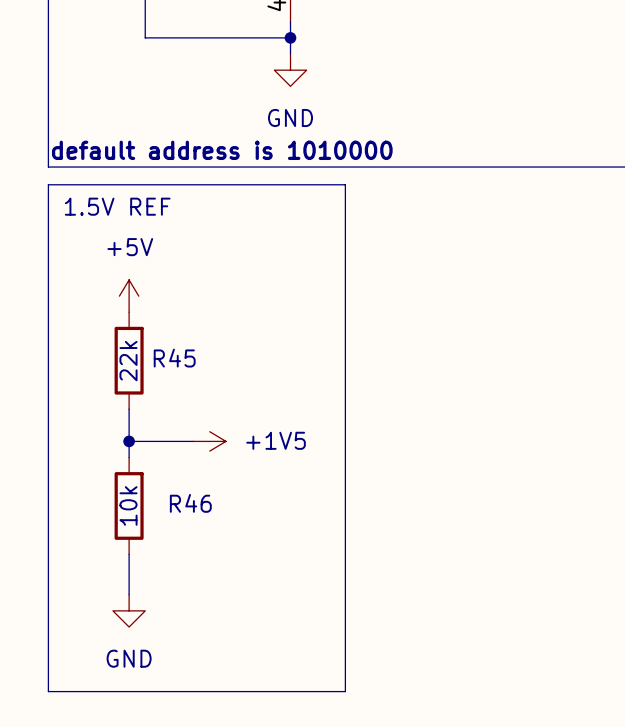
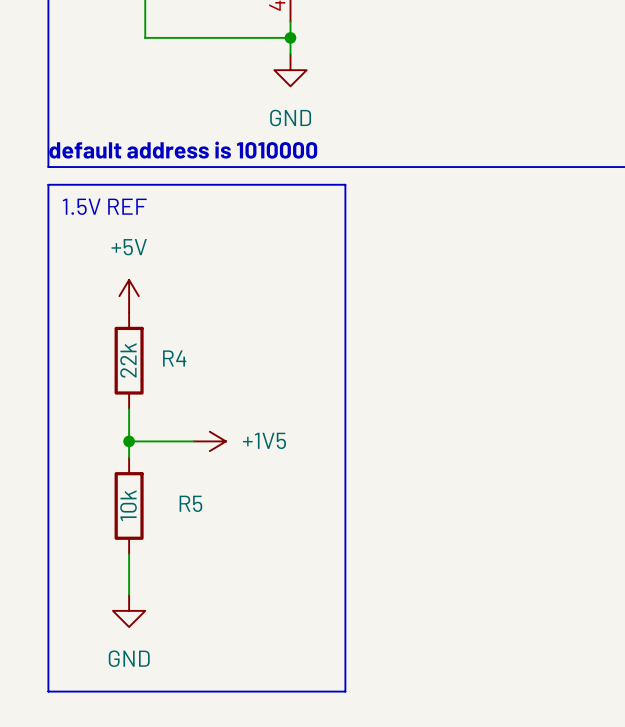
R45 name: R45 (174, 358) -> R4 (174, 358)
R46 name: R46 (190, 503) -> R5 (190, 503)

